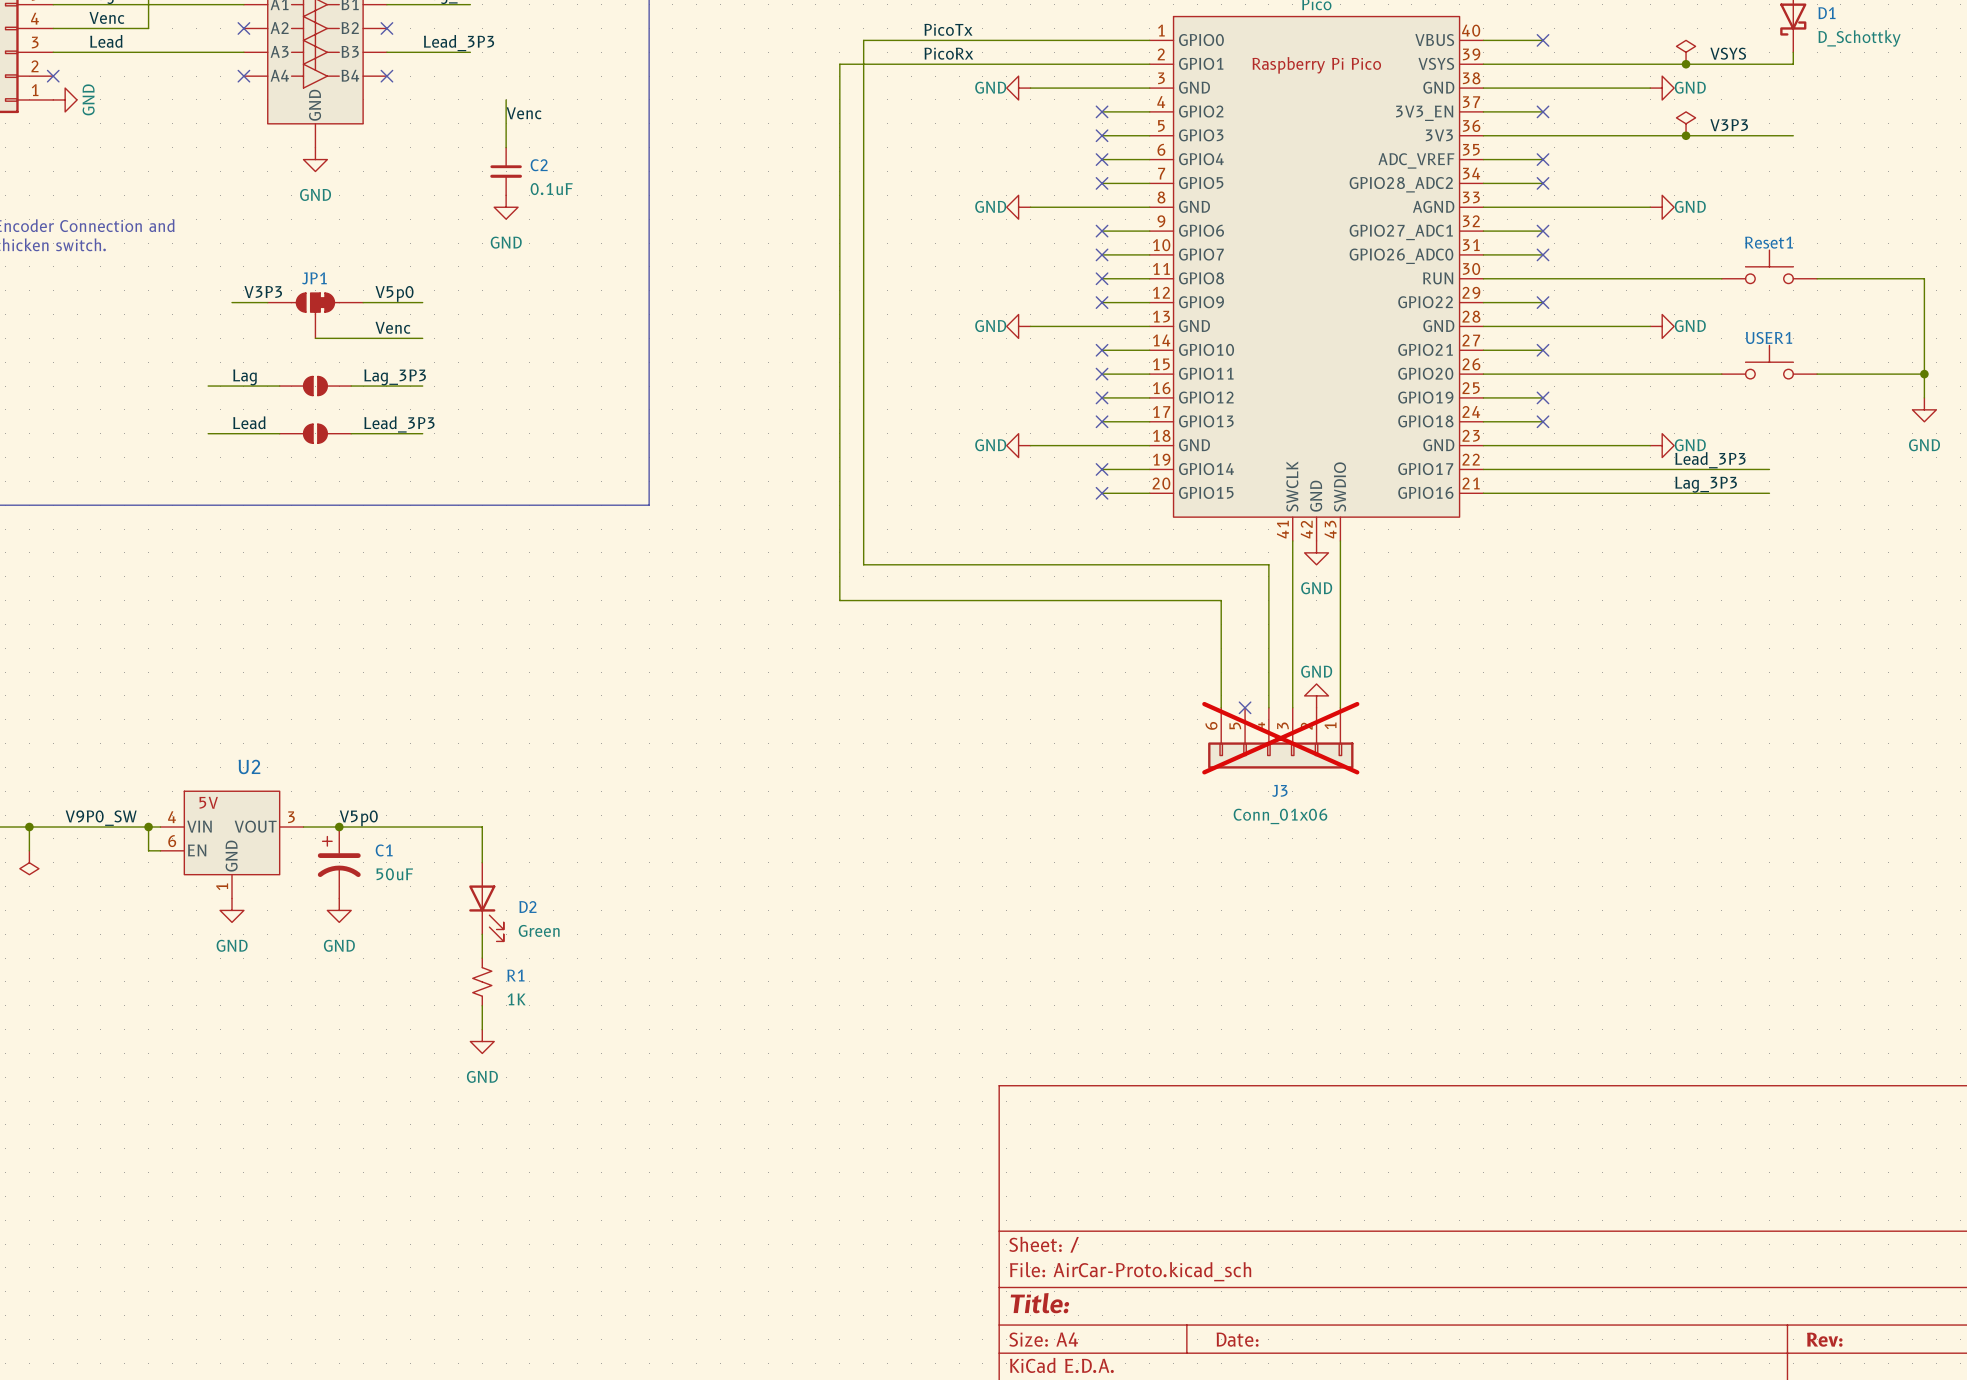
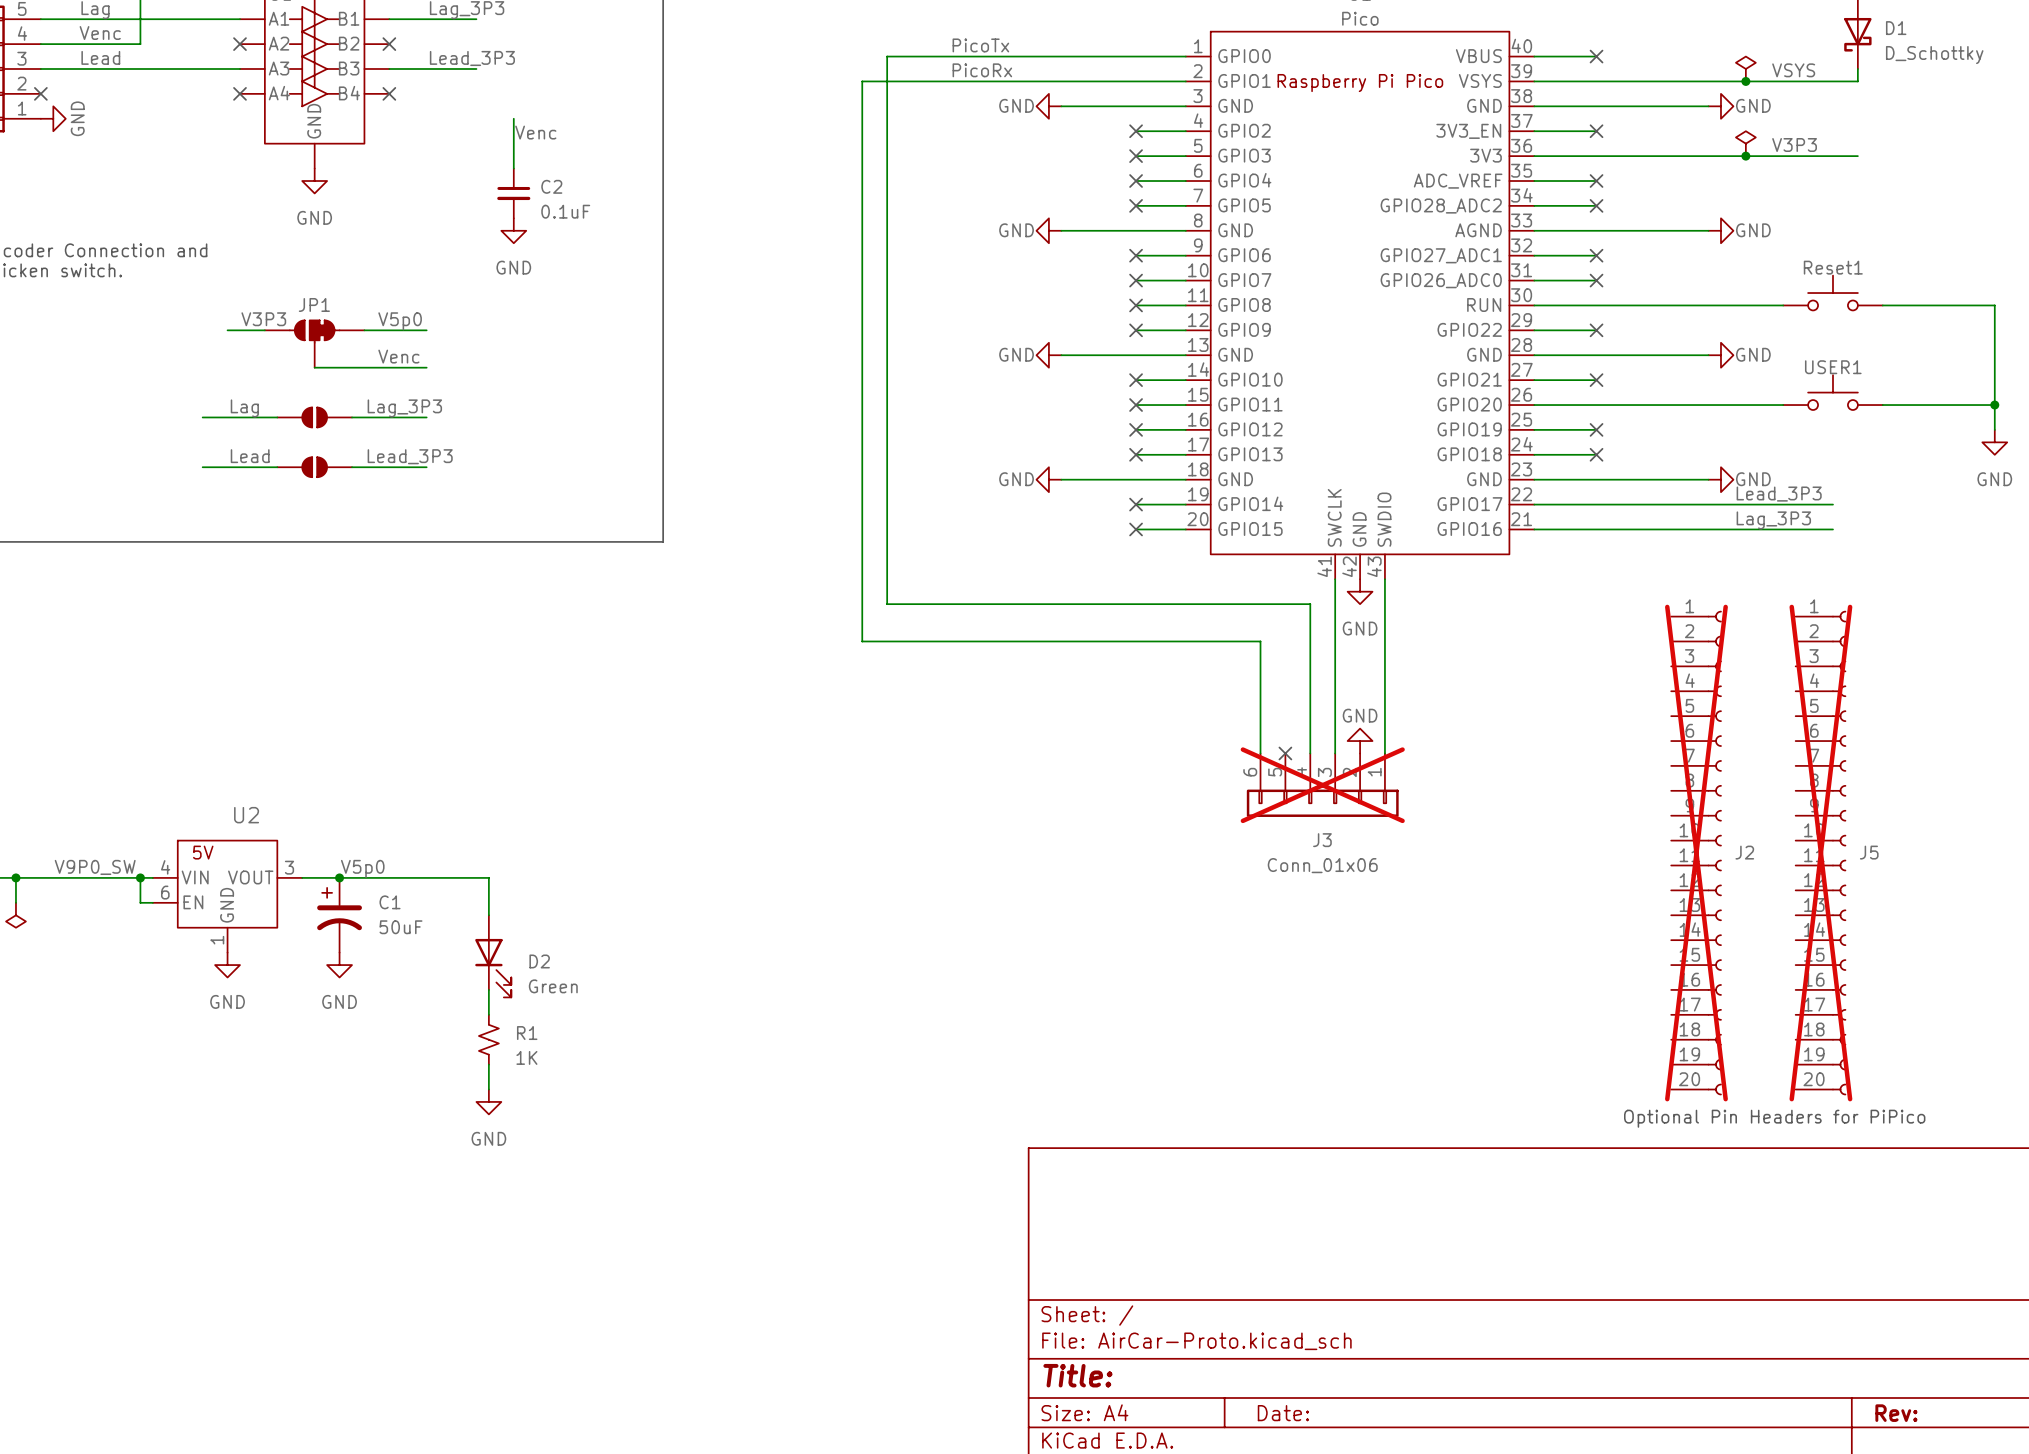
J2: none -> (1696, 853)
J5: none -> (1820, 853)
text: none -> Optional Pin Headers for PiPico (1774, 1118)

